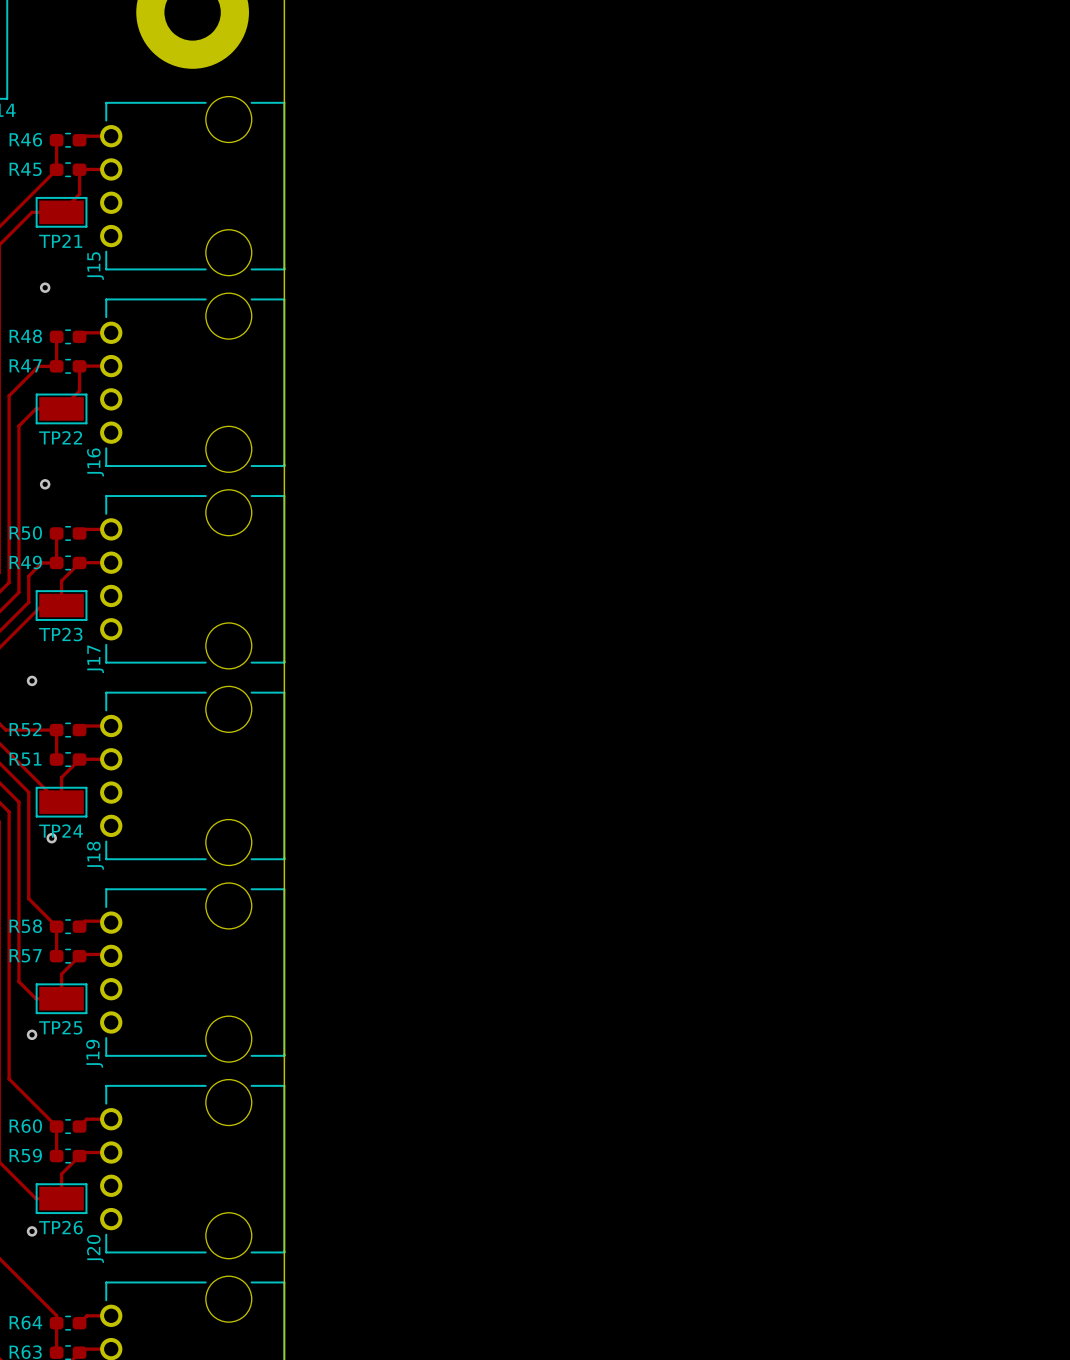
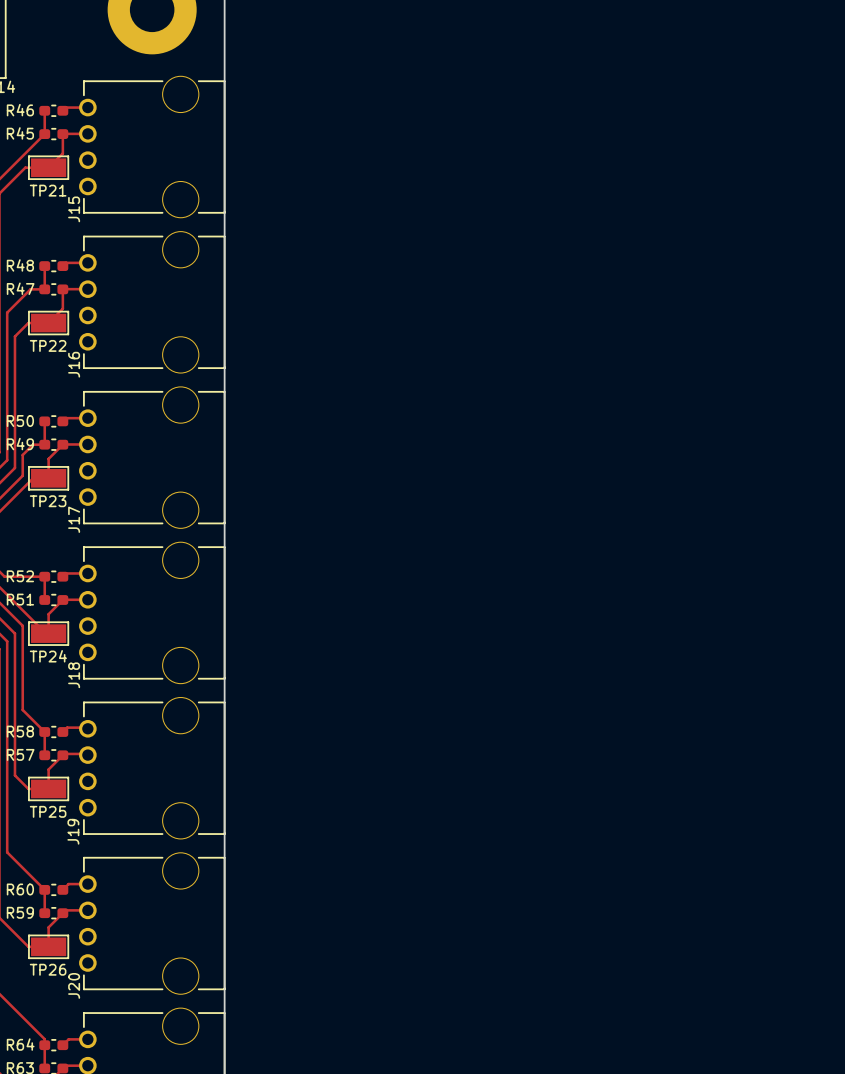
via: (45, 287) -> none
via: (45, 484) -> none
via: (32, 680) -> none
via: (51, 838) -> none
via: (32, 1034) -> none
via: (32, 1231) -> none

